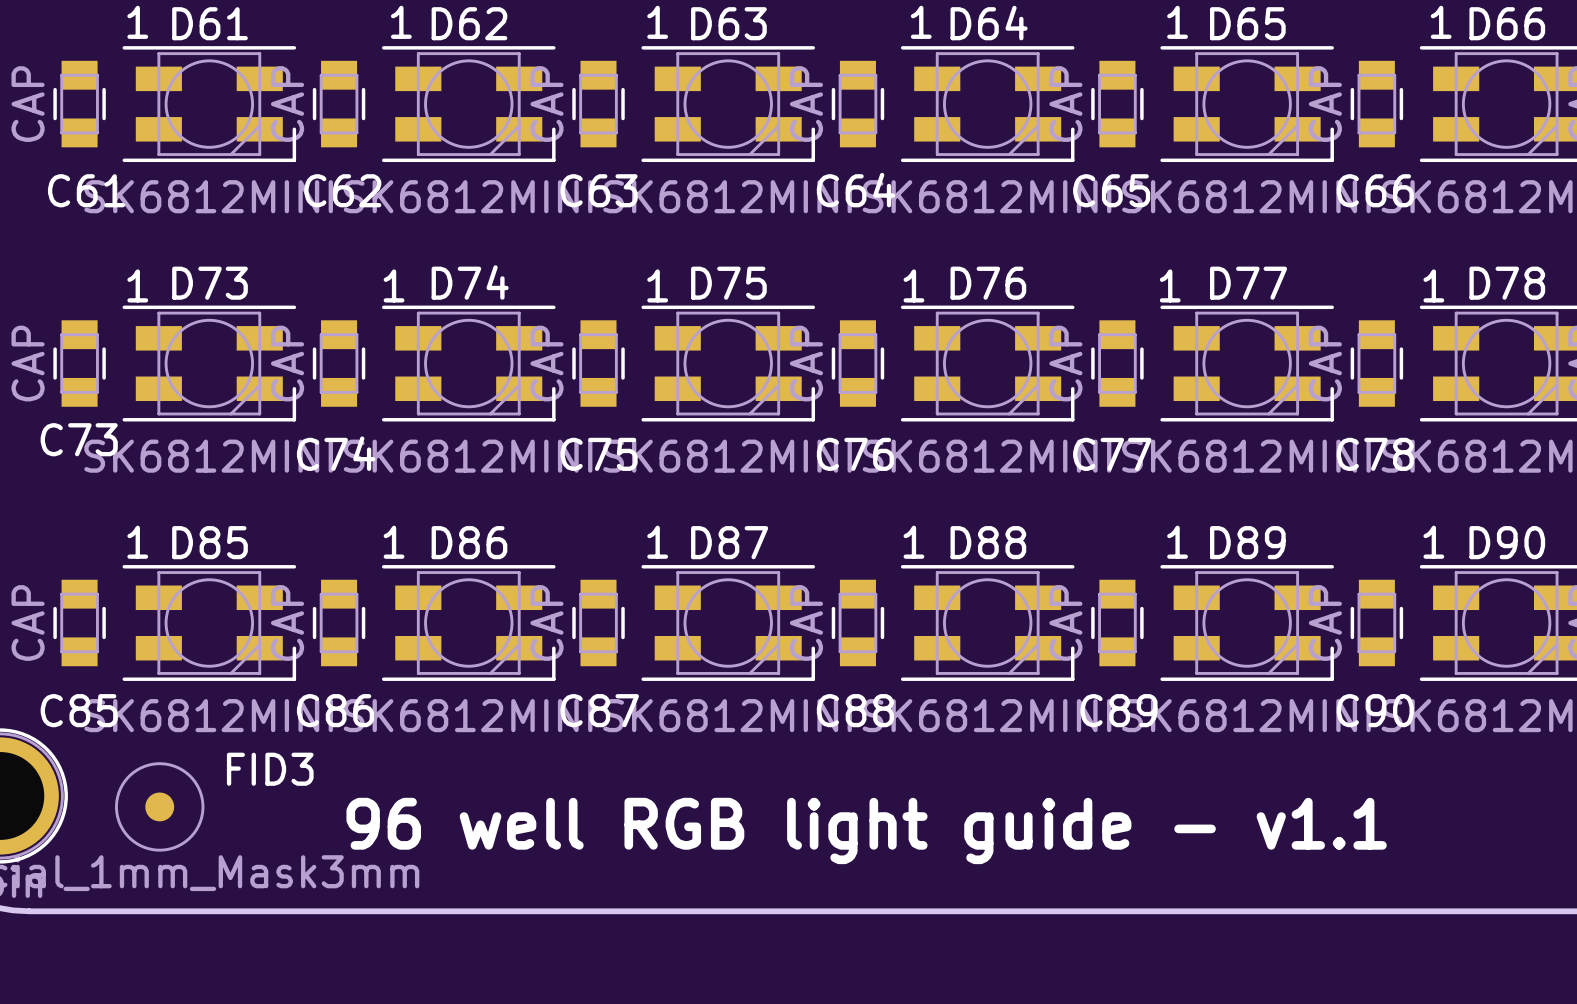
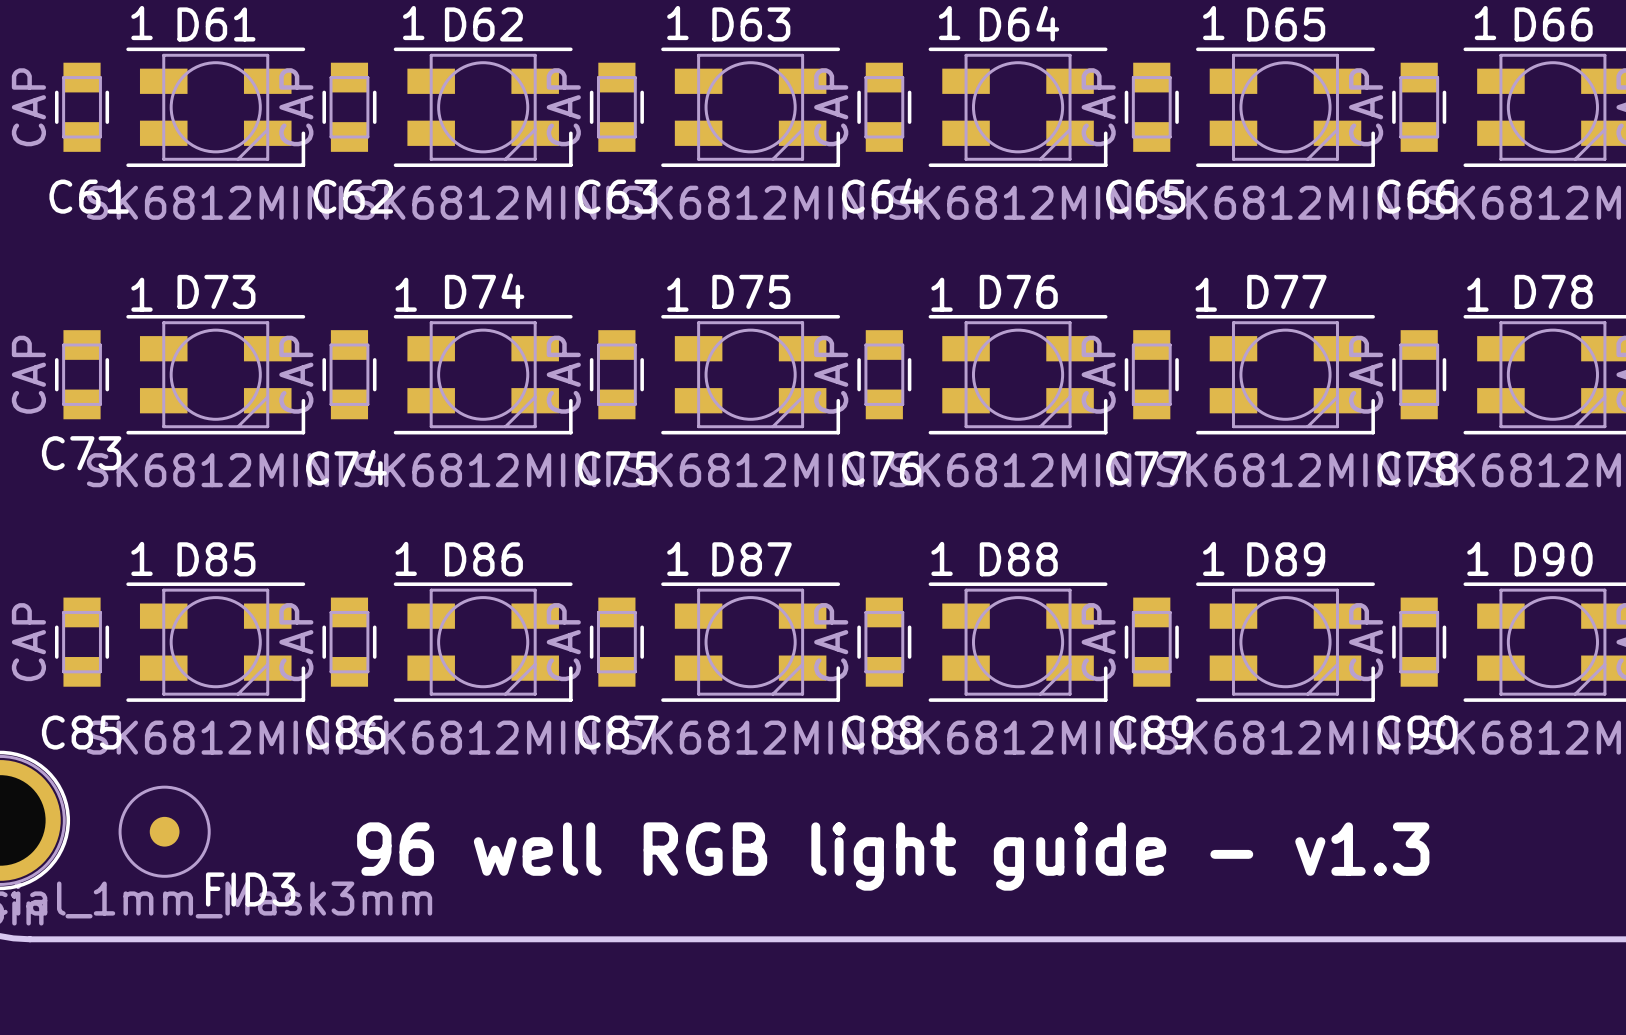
FID3 name position: FID3 (270, 769) -> FID3 (250, 889)
text: 96 well RGB light guide - v1.1 (866, 830) -> 96 well RGB light guide - v1.3 (893, 856)

